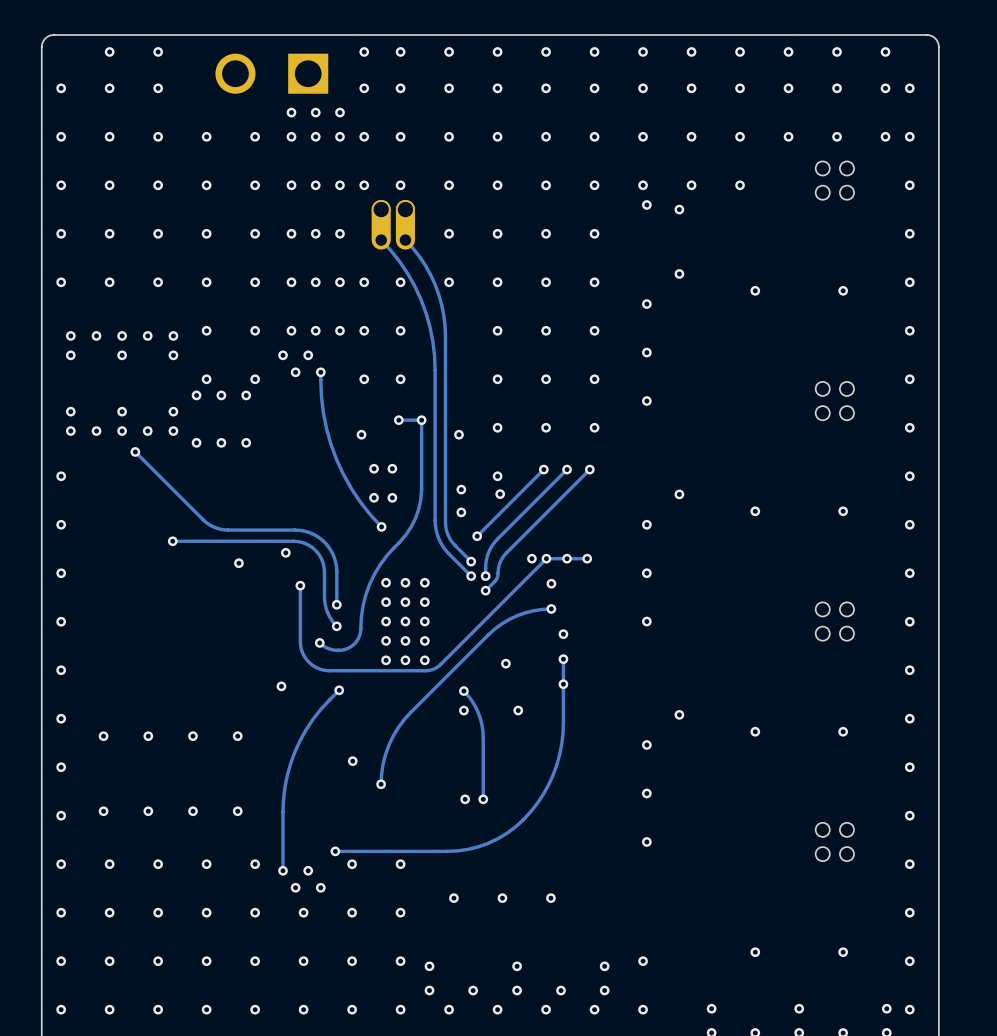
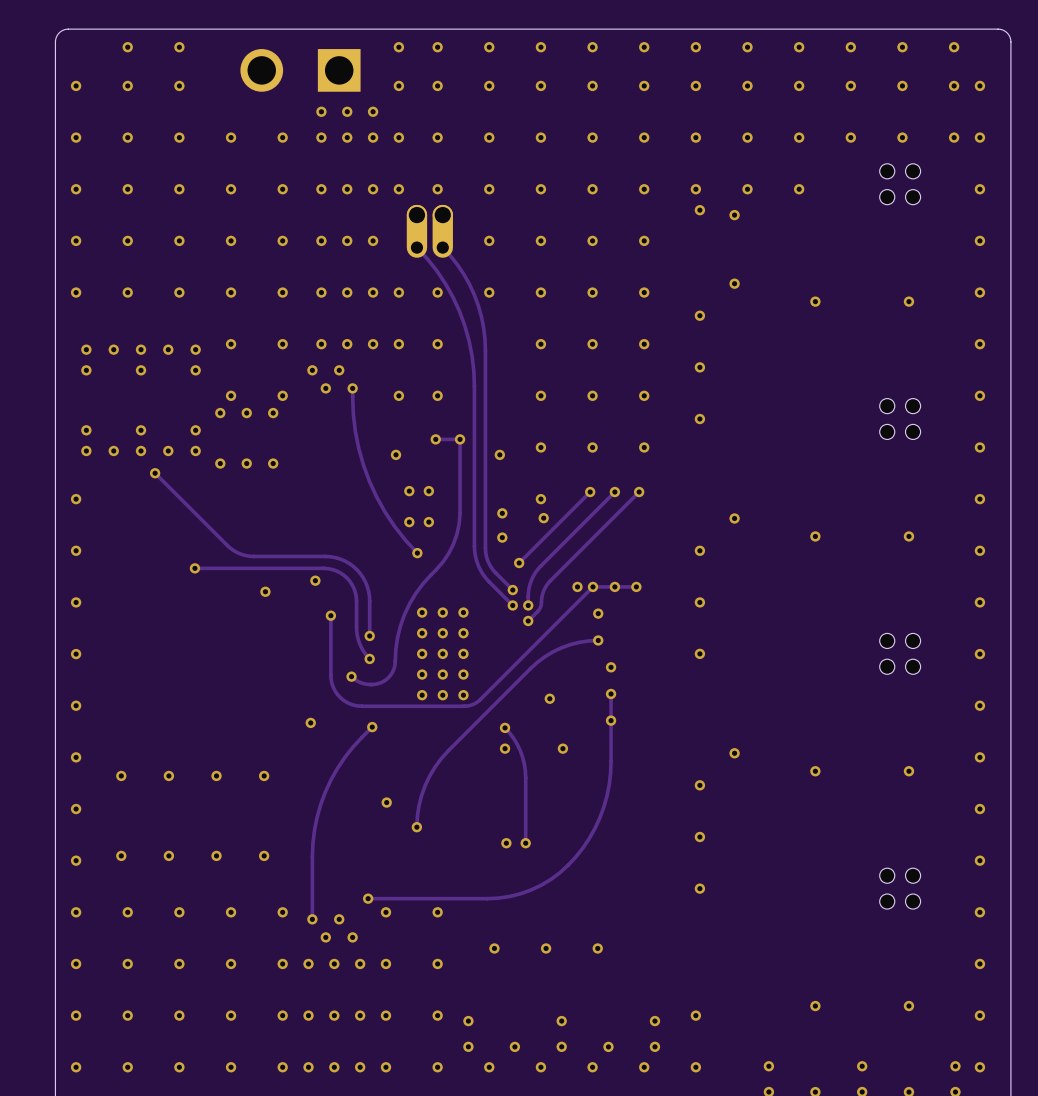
via: none -> (308, 963)
via: none -> (360, 963)
via: none -> (308, 1015)
via: none -> (360, 1015)
via: none -> (308, 1067)
via: none -> (360, 1067)

